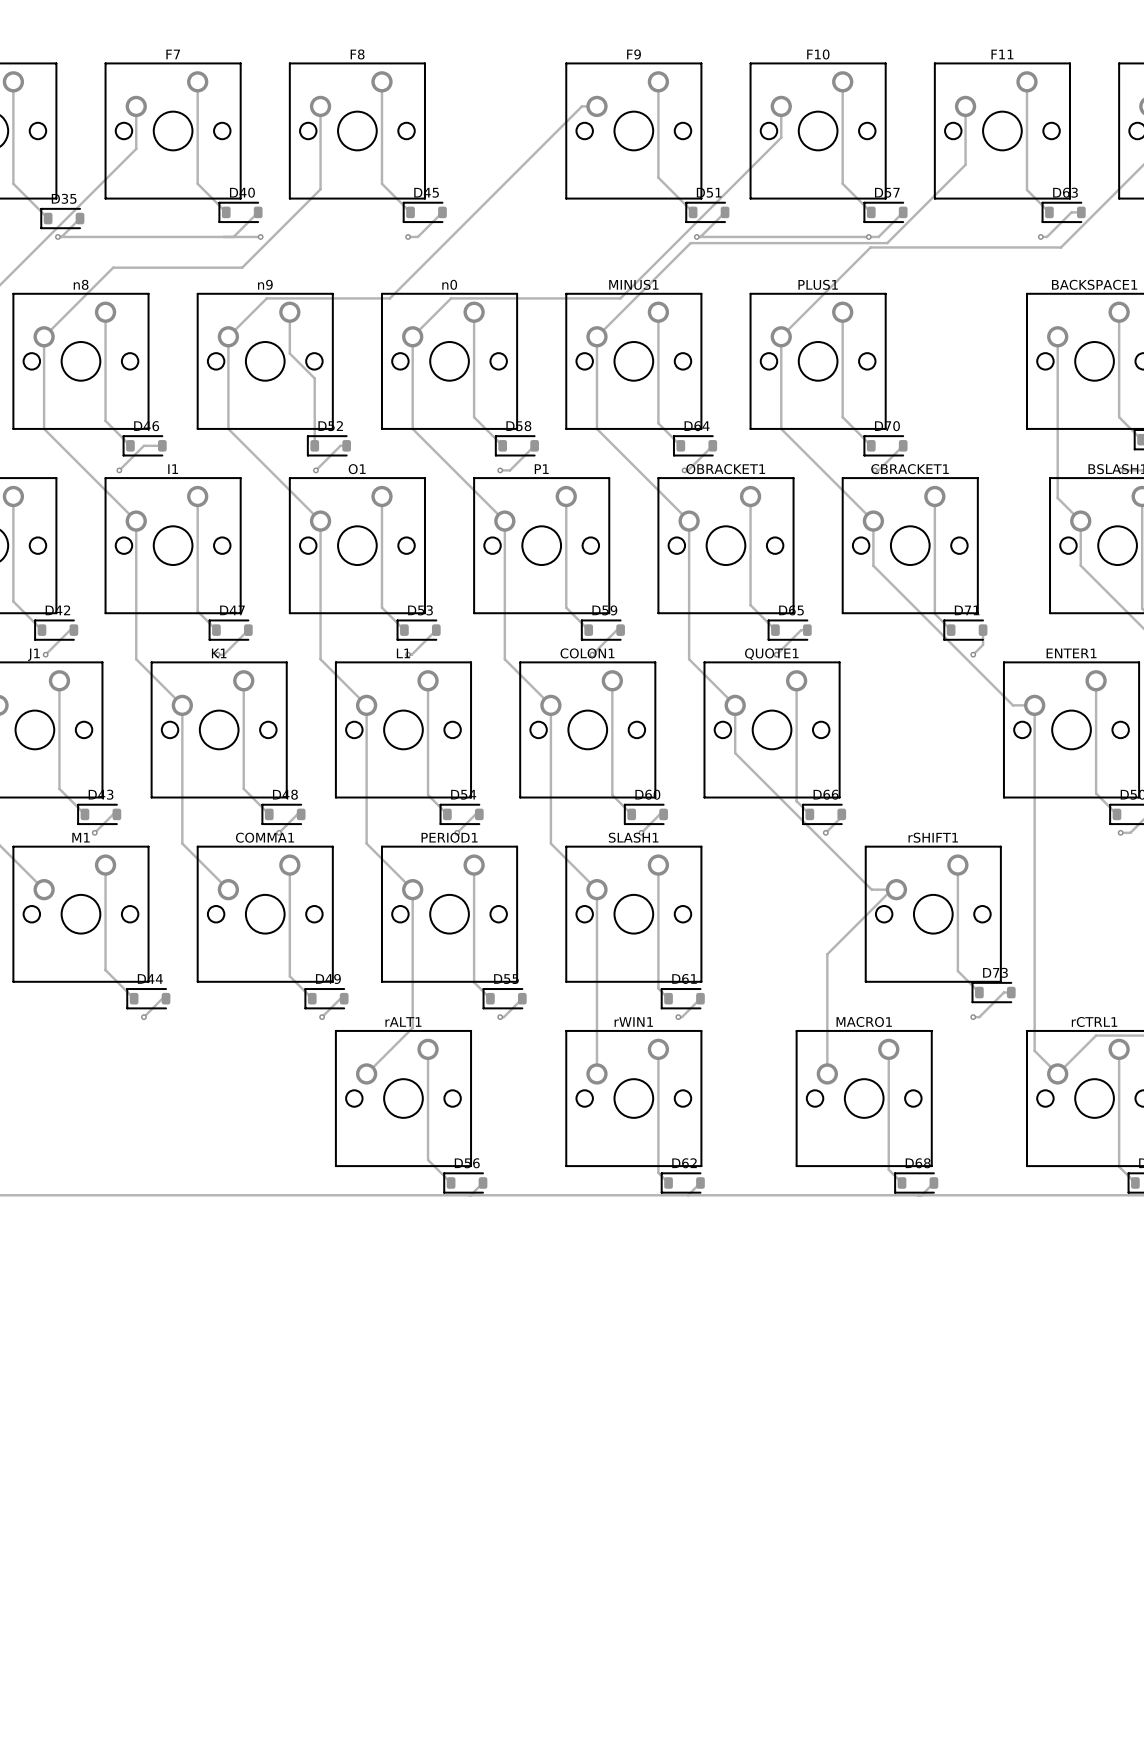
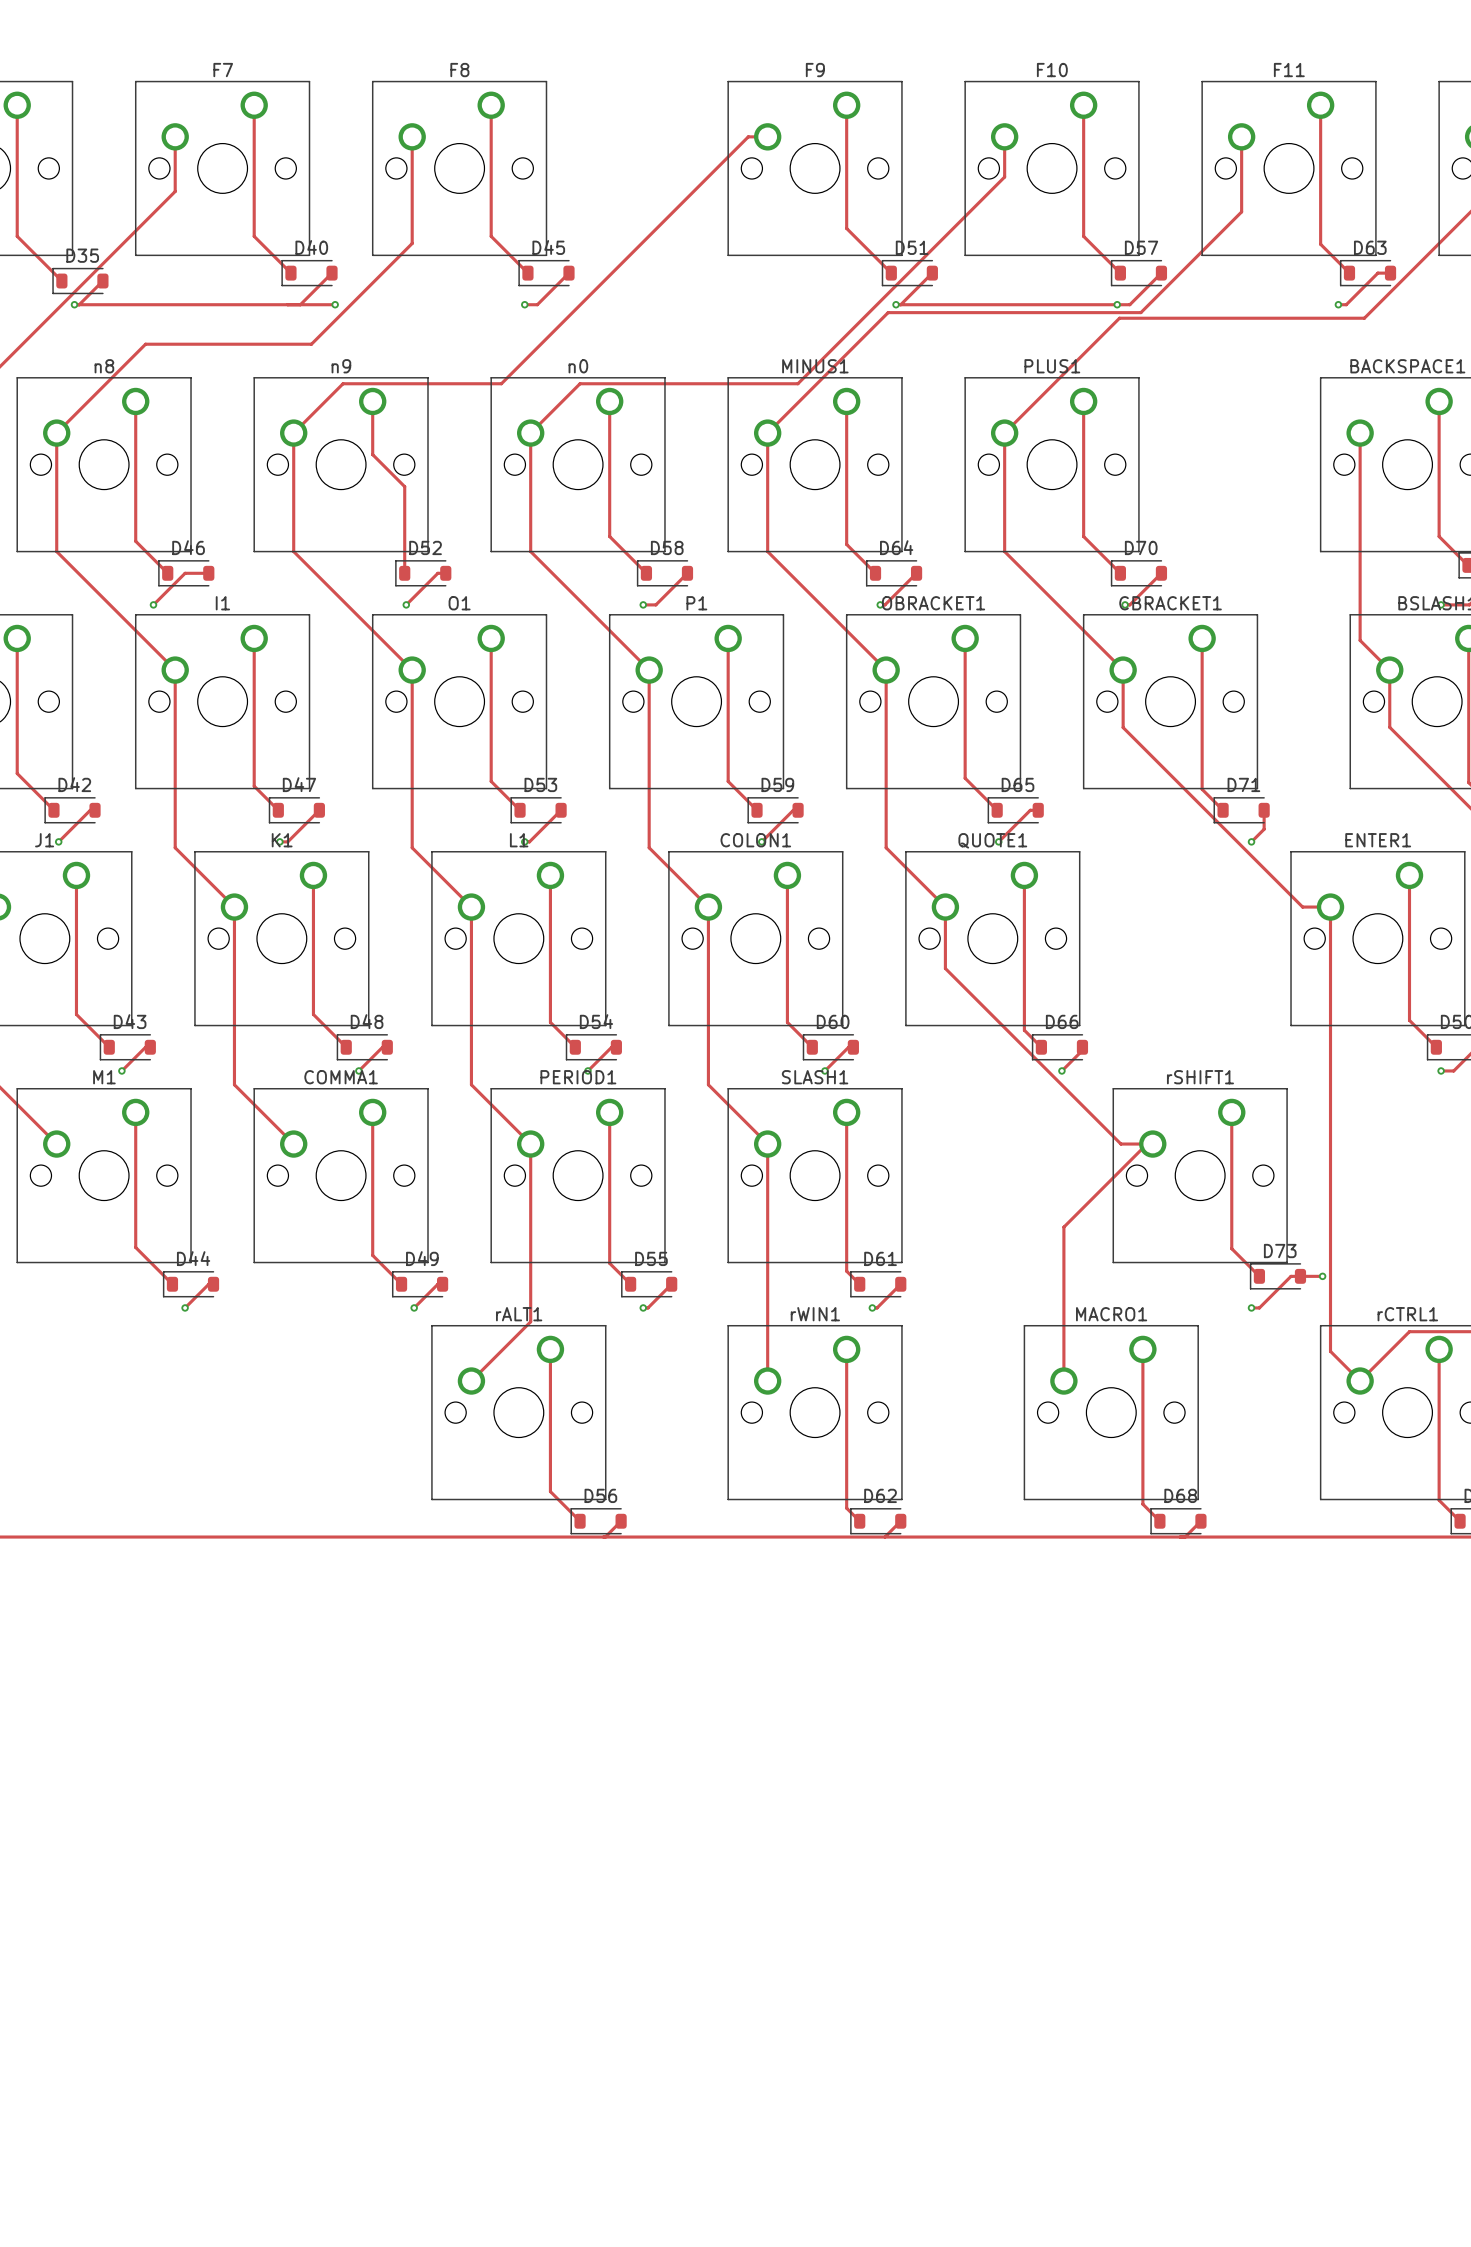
track: none -> (1300, 1276) (1322, 1276)
via: none -> (1322, 1276)

